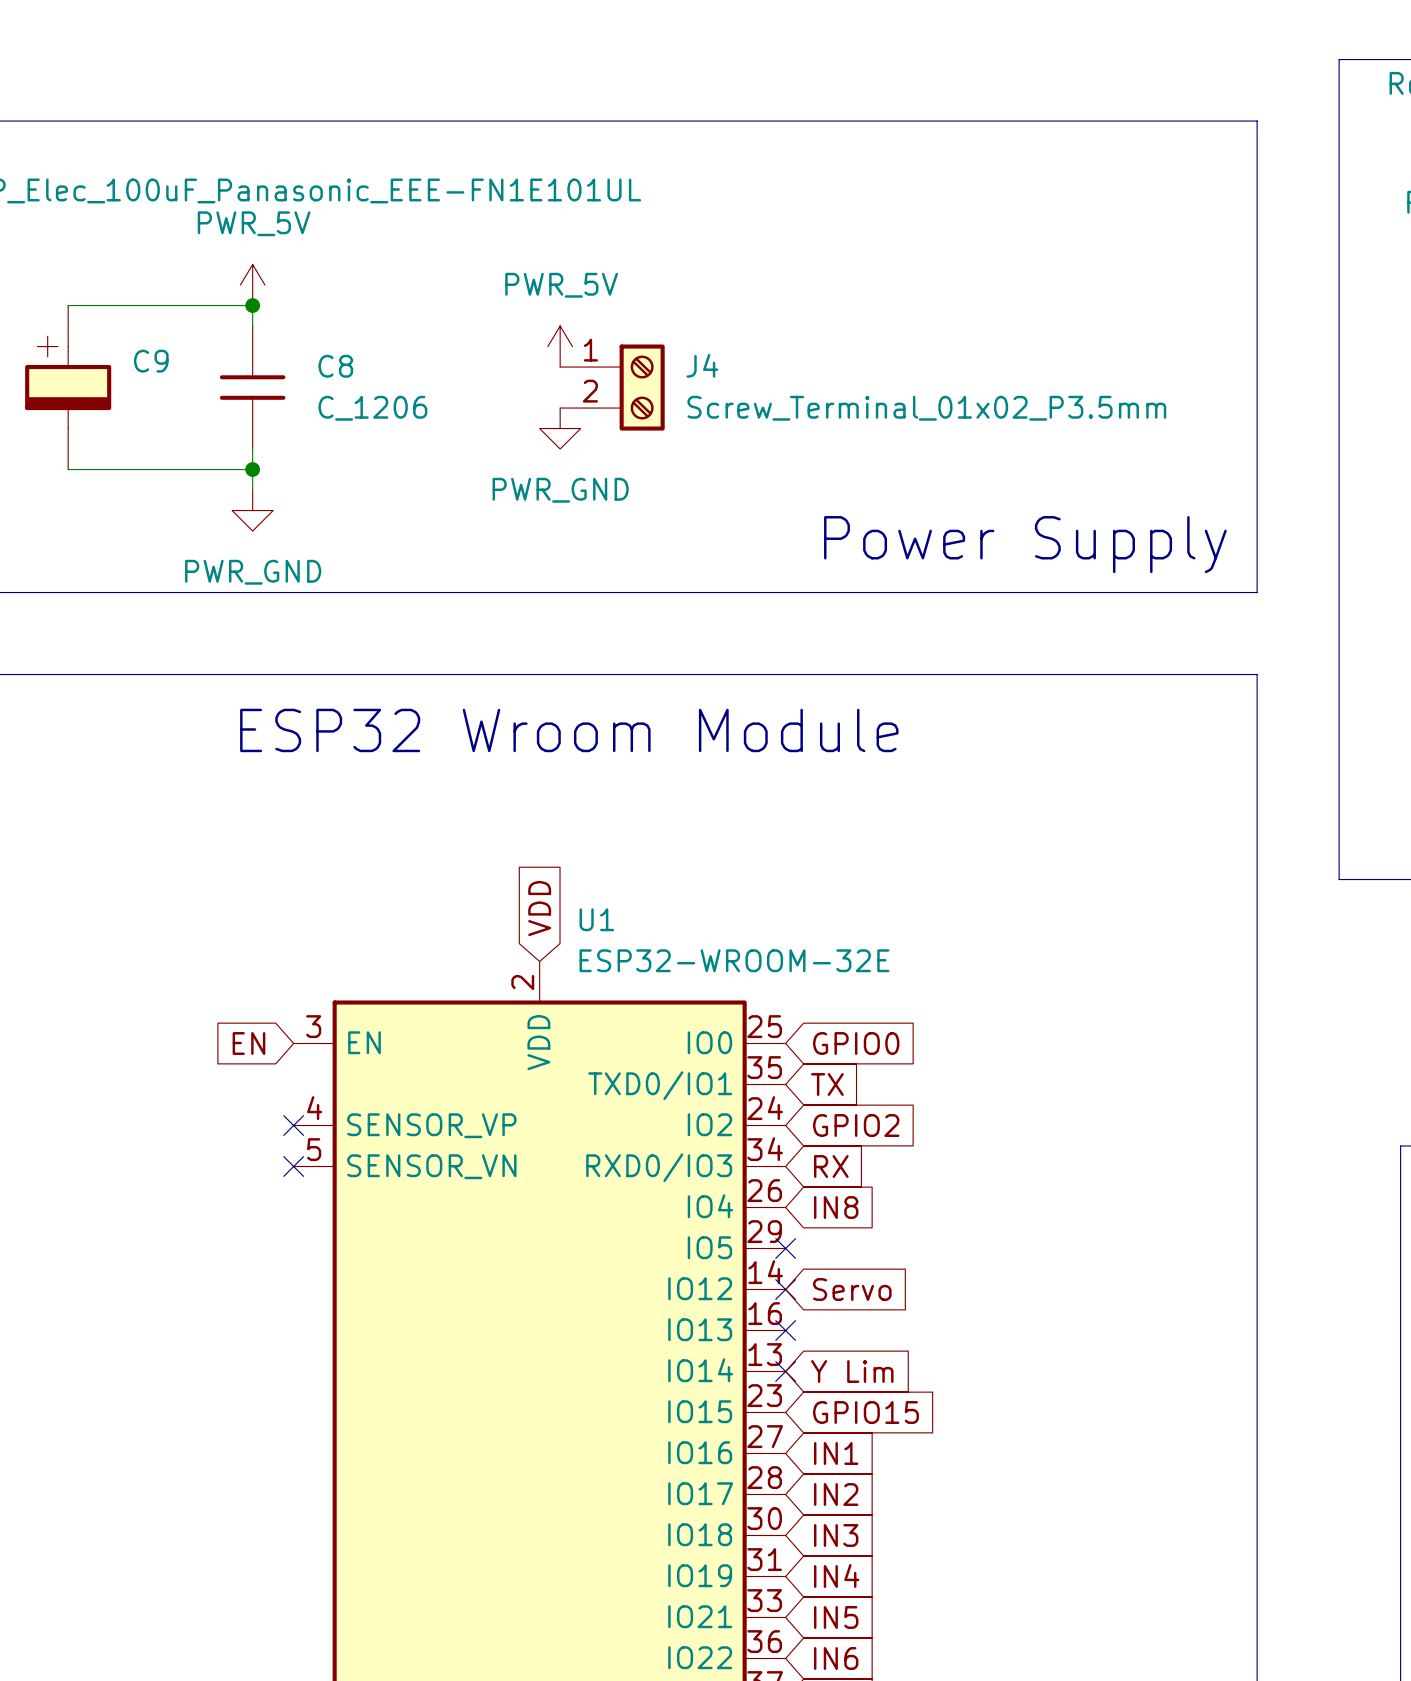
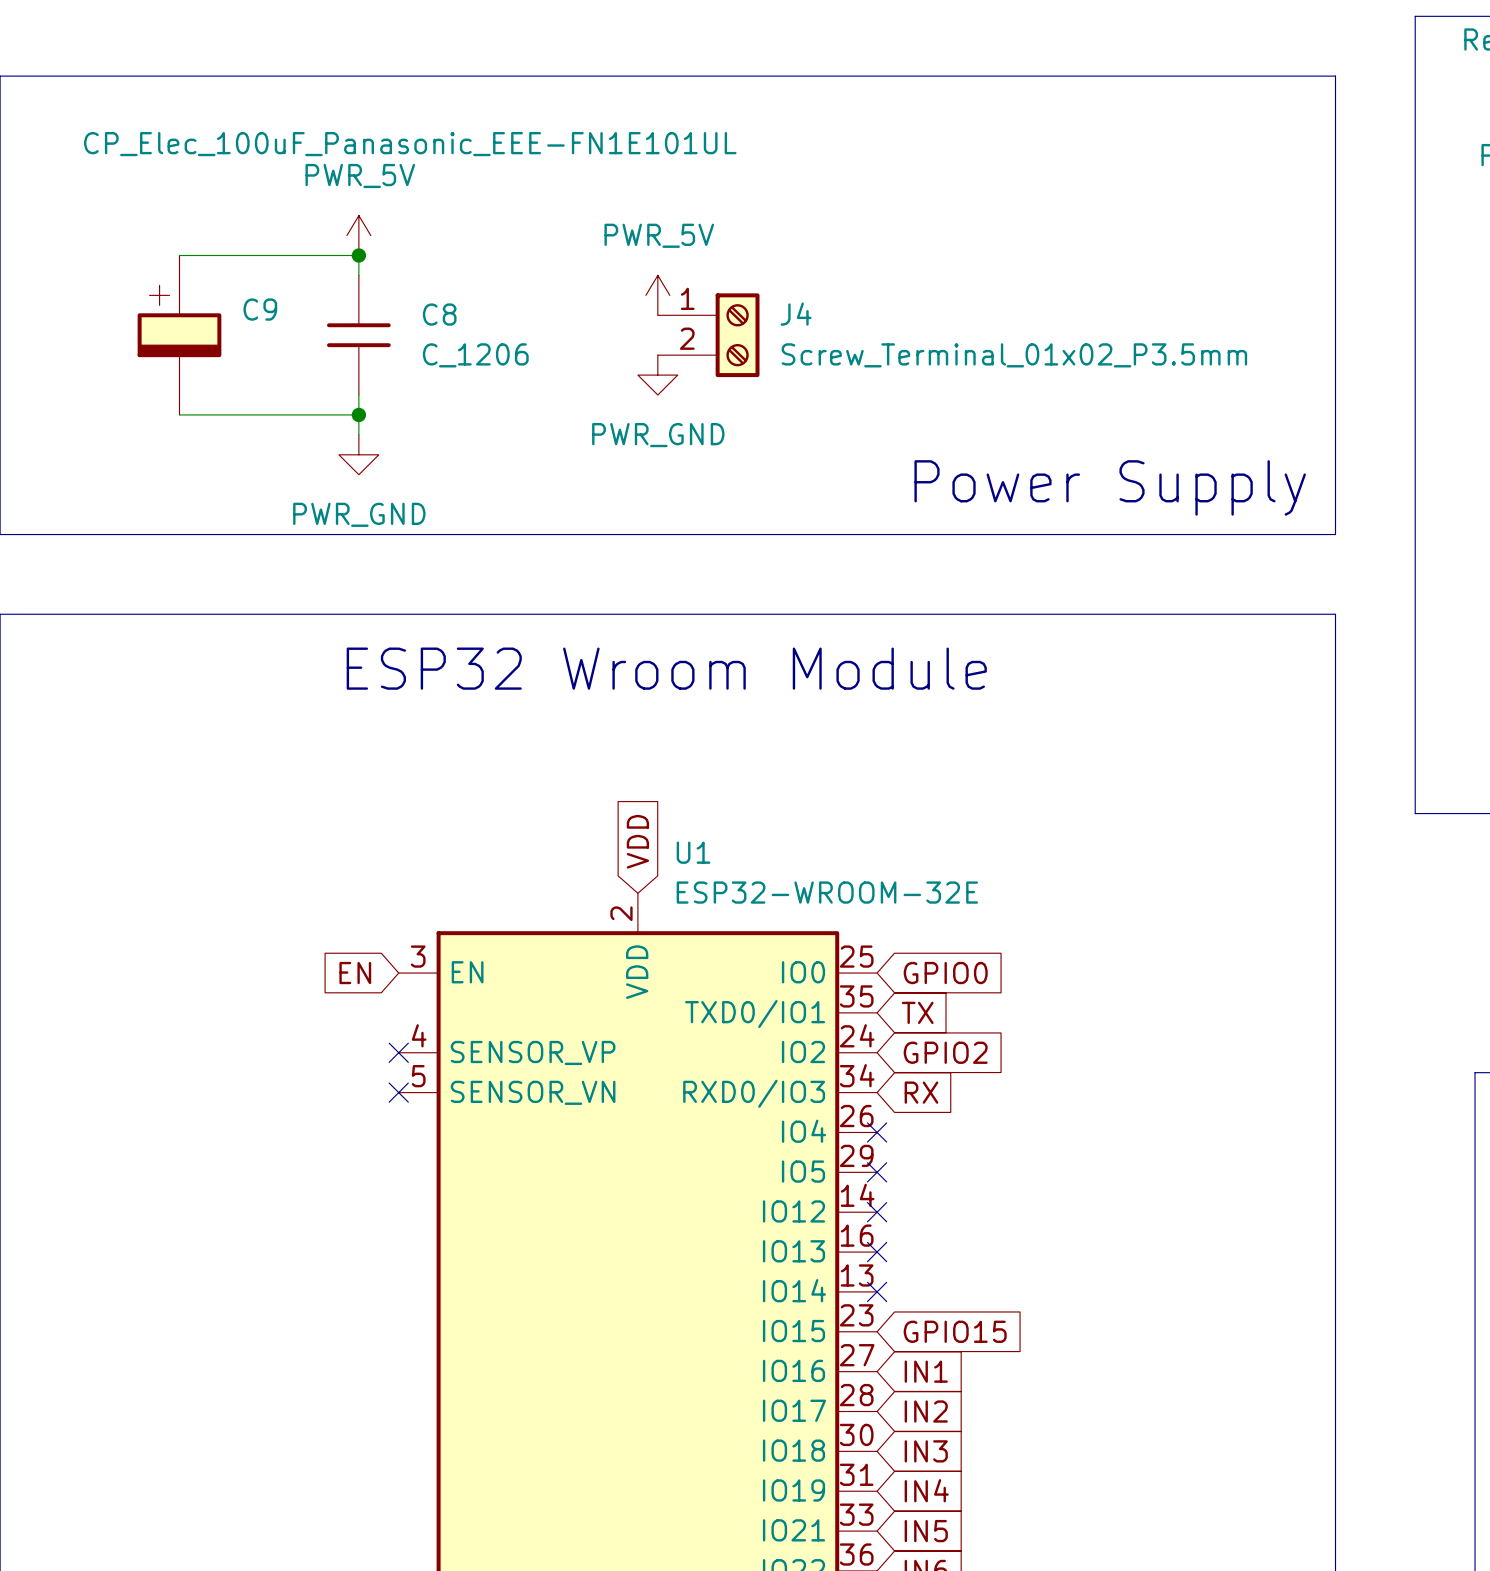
no-connect mark: none -> (877, 1132)
global label: IN8 (836, 1207) -> none
global label: Servo (852, 1289) -> none
global label: Y Lim (852, 1371) -> none

